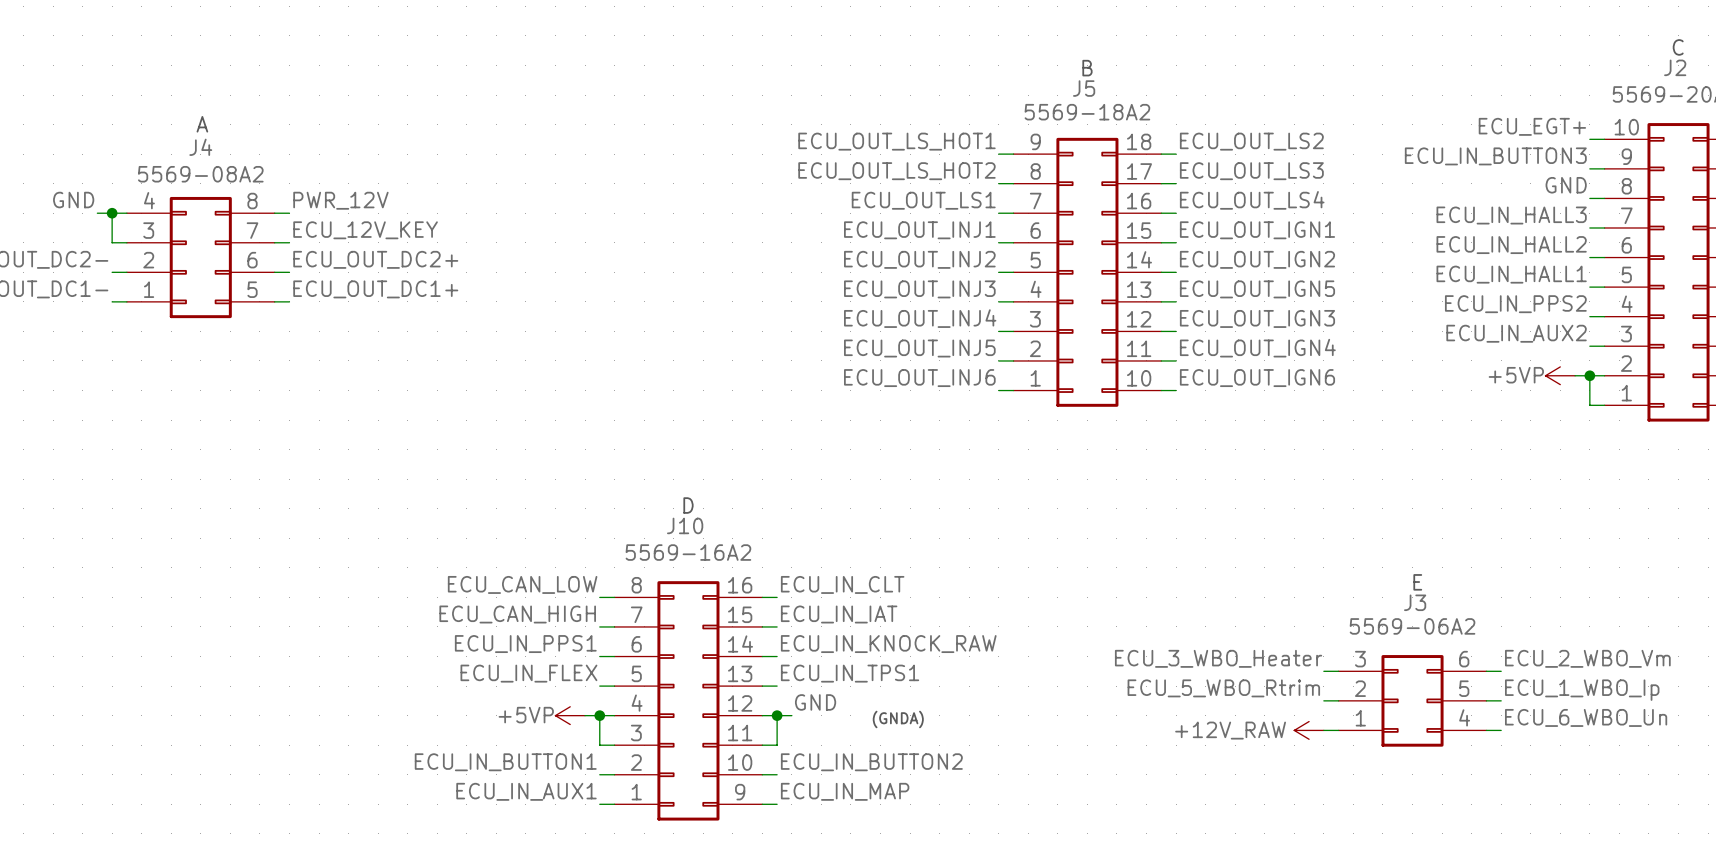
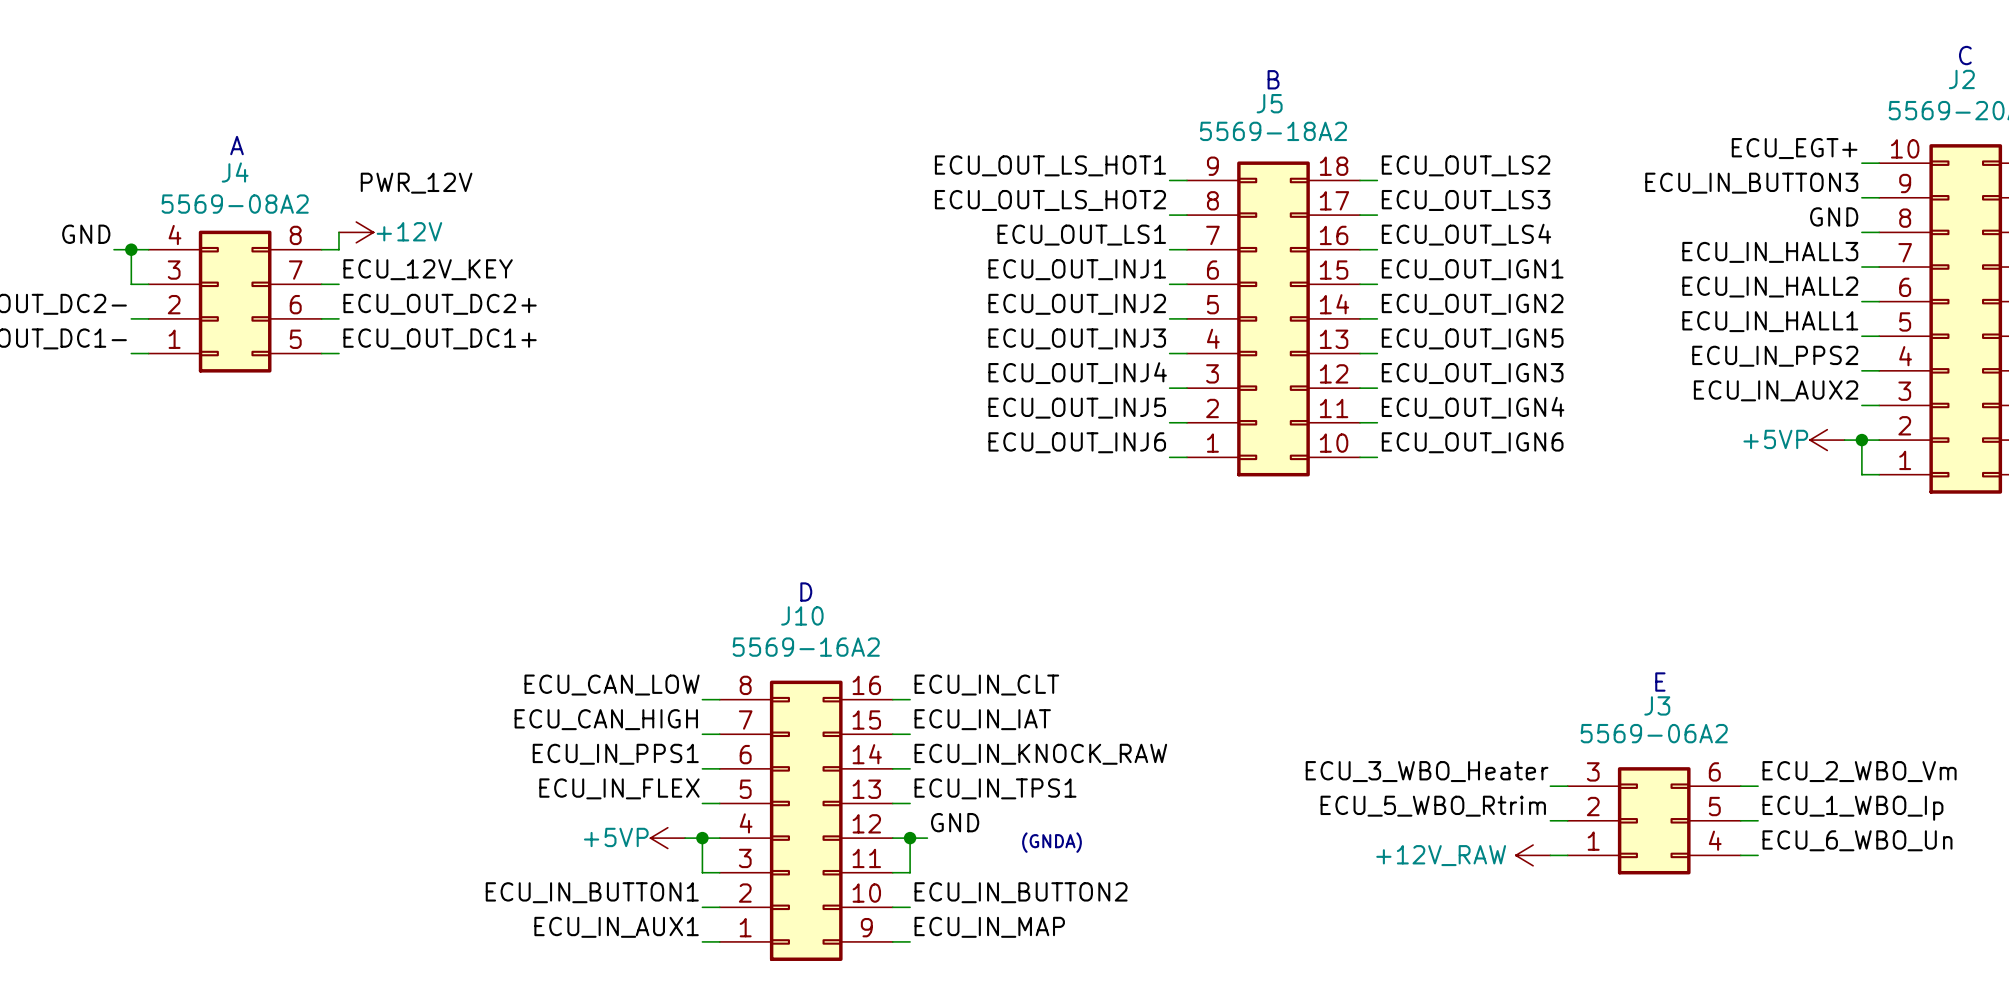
wire: none -> (338, 232) (338, 249)
power symbol: none -> +12V (356, 232)
label position: PWR_12V (340, 200) -> PWR_12V (416, 183)

